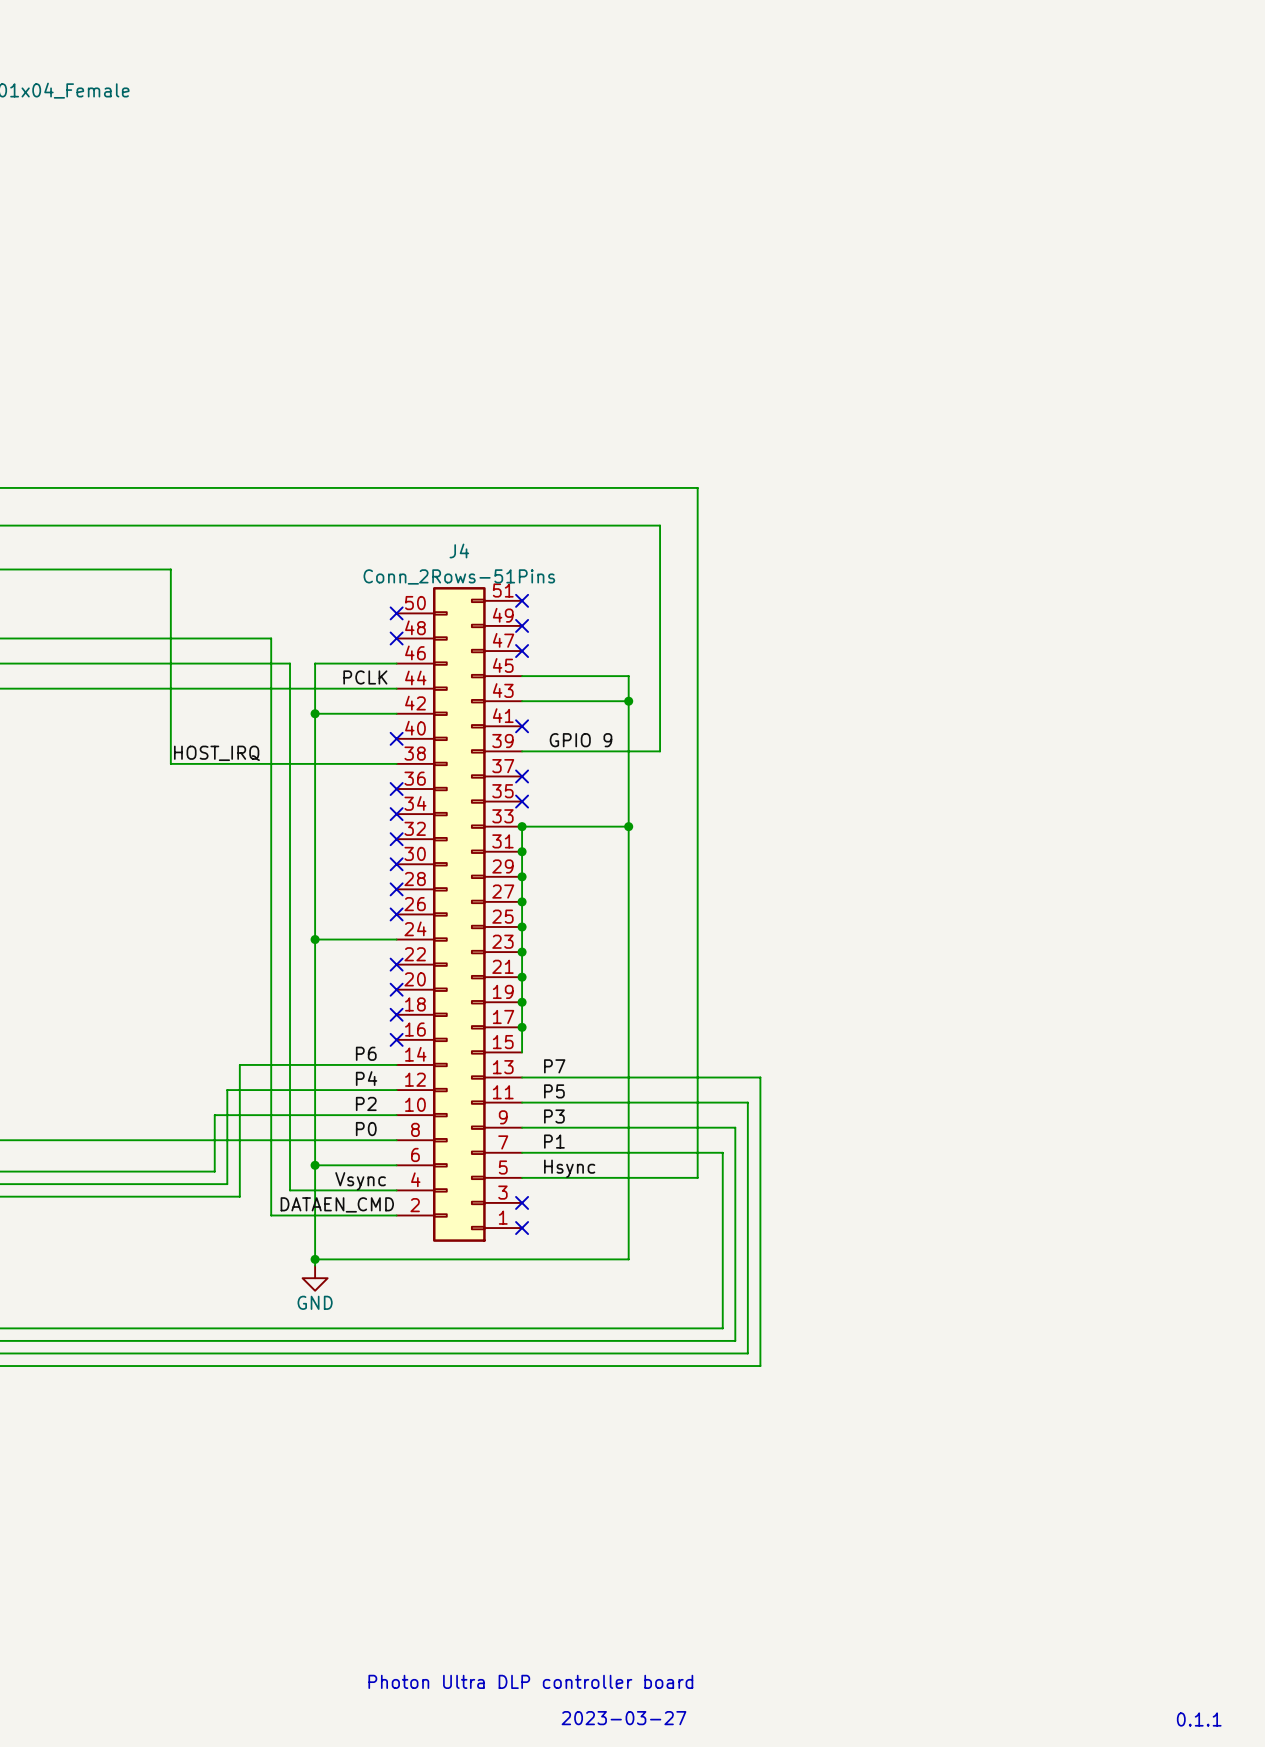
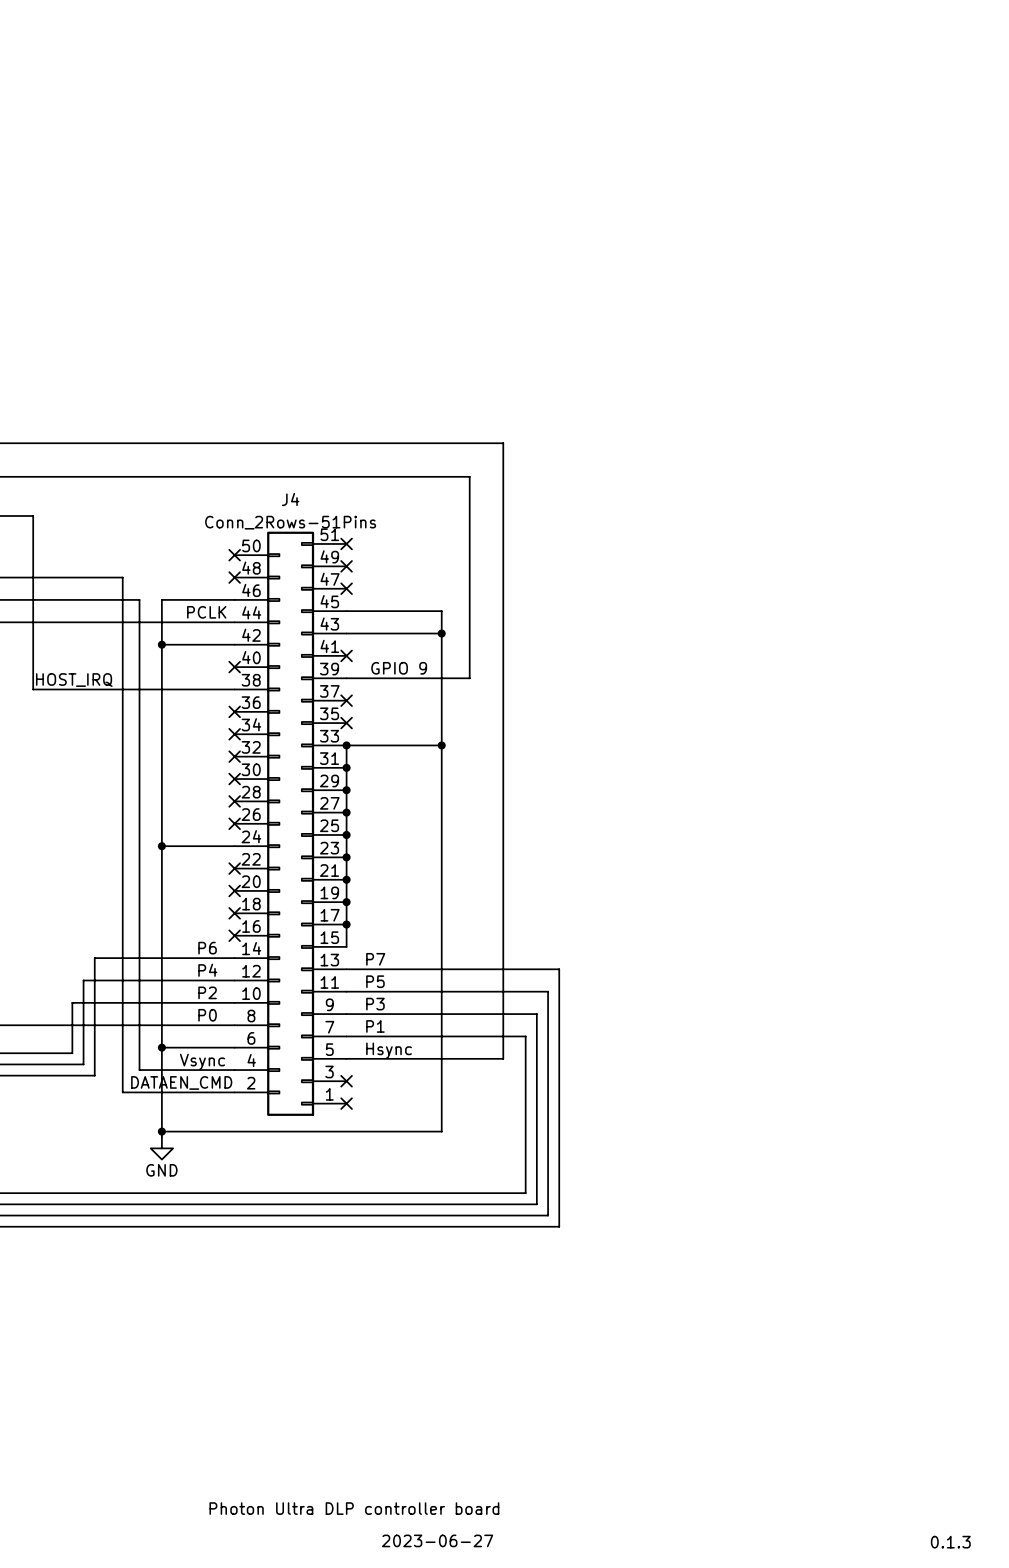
text: 2023-03-27 (624, 1718) -> 2023-06-27 (437, 1540)
text: 0.1.1 (1199, 1719) -> 0.1.3 (950, 1542)

